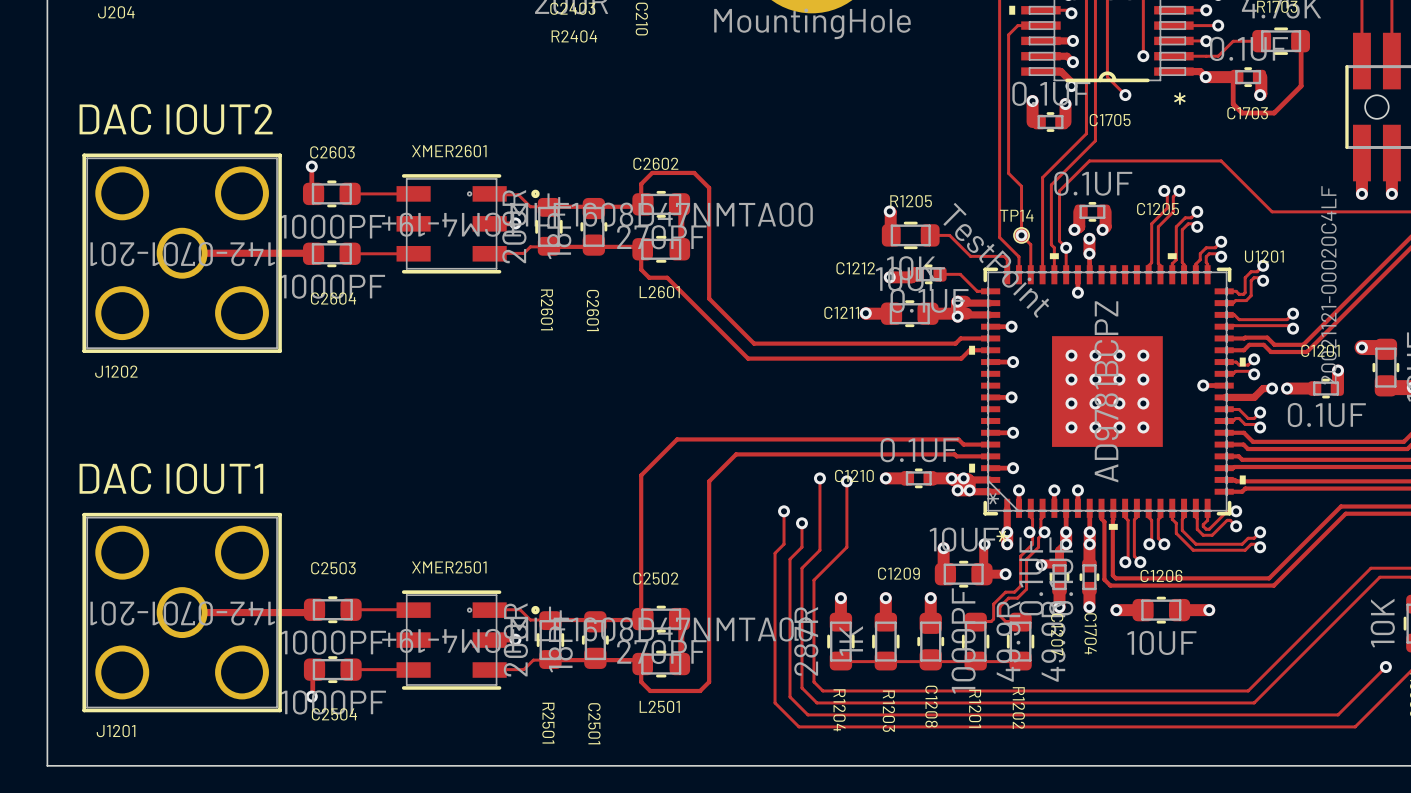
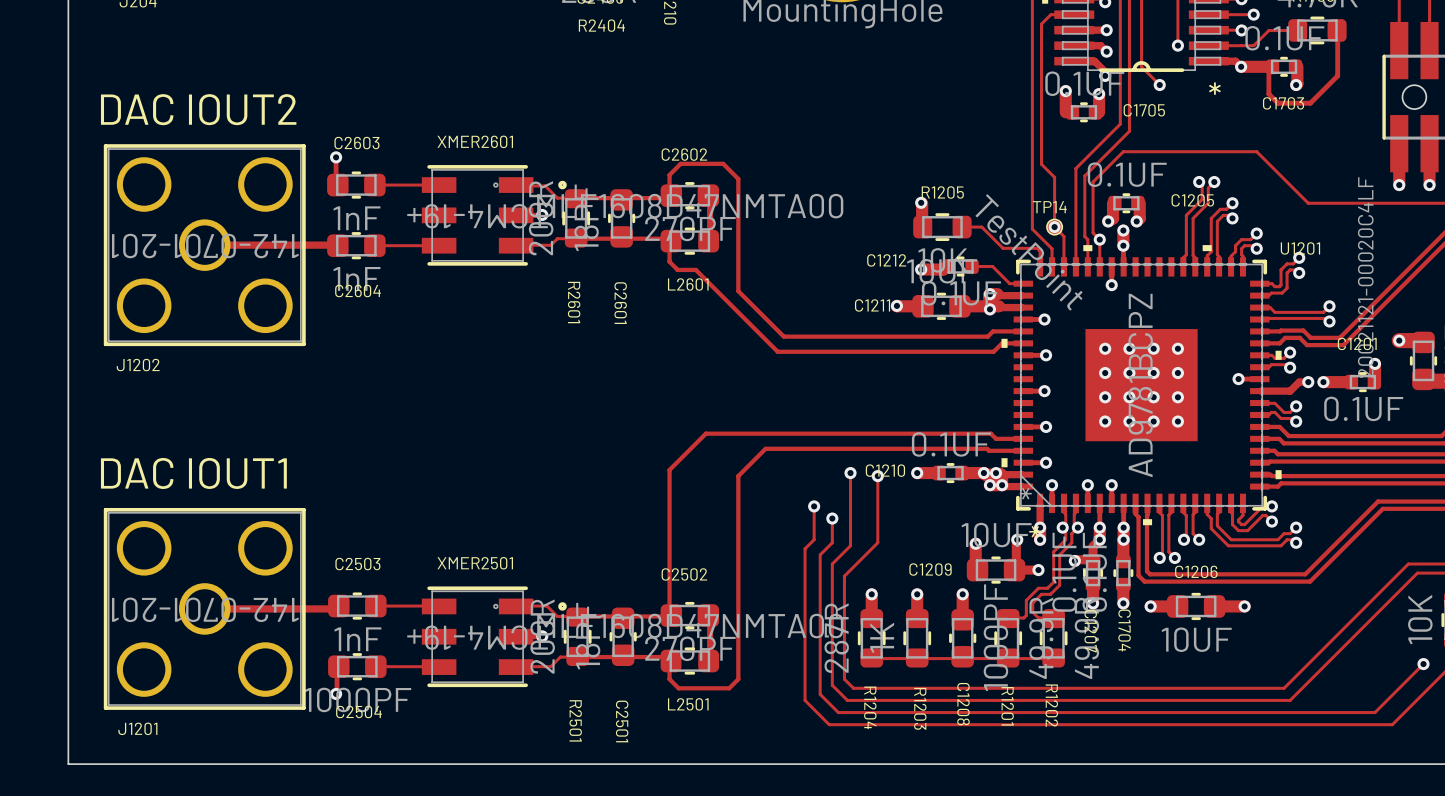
C2603 value: 1000PF (332, 226) -> 1nF (356, 218)
C2604 value: 1000PF (332, 286) -> 1nF (356, 278)
C2503 value: 1000PF (333, 642) -> 1nF (357, 639)

